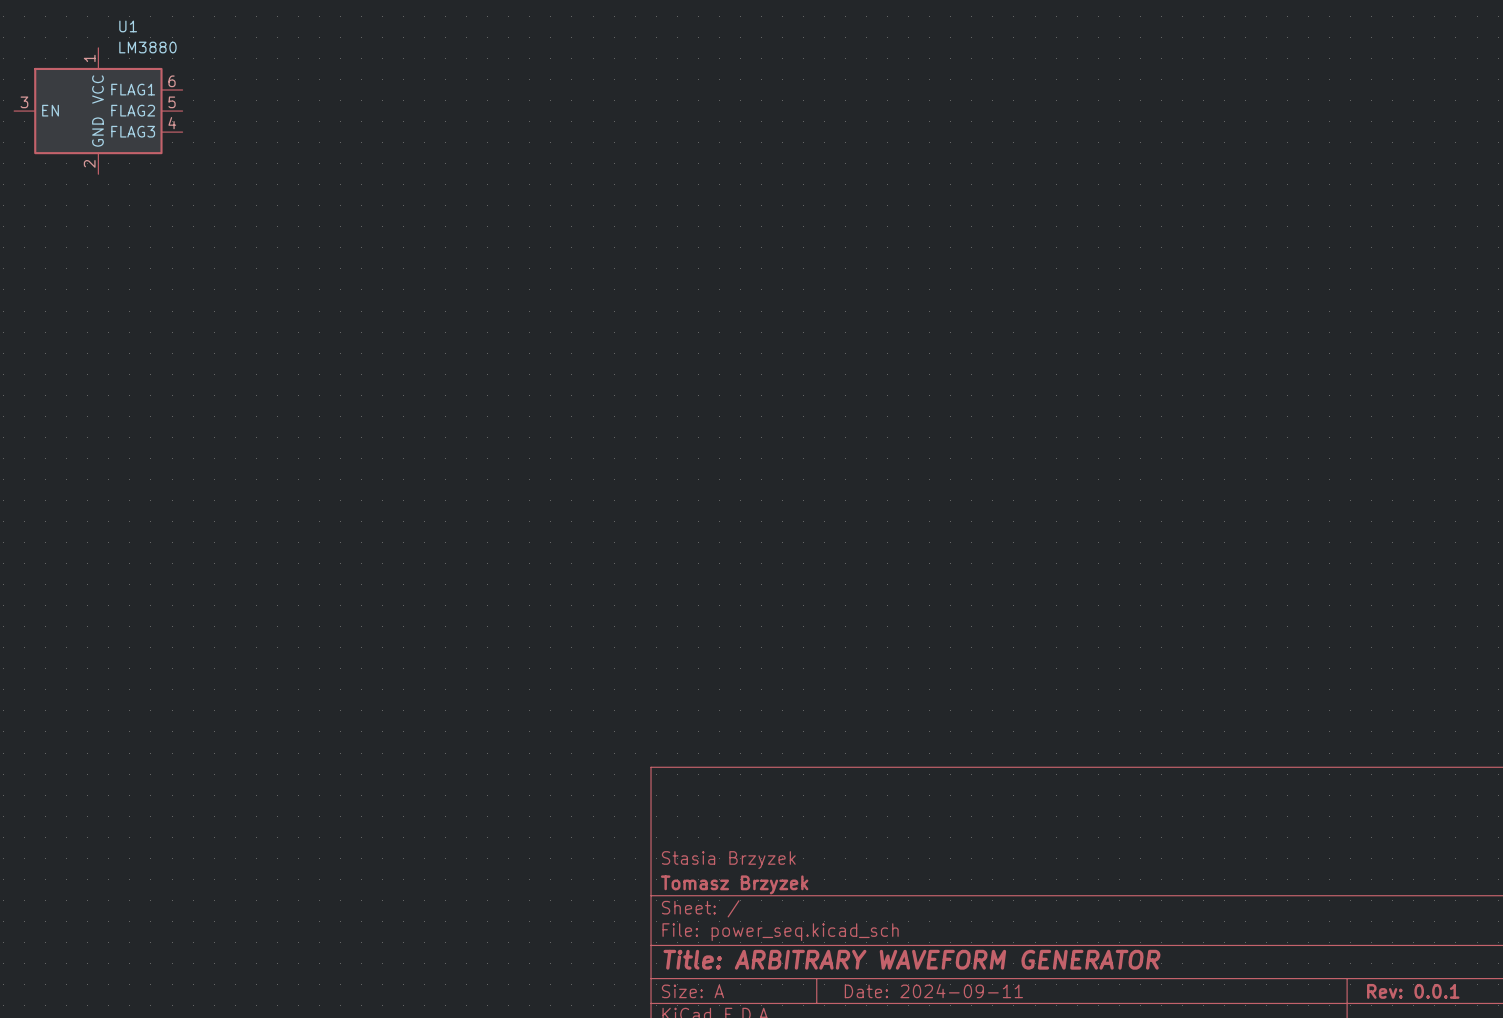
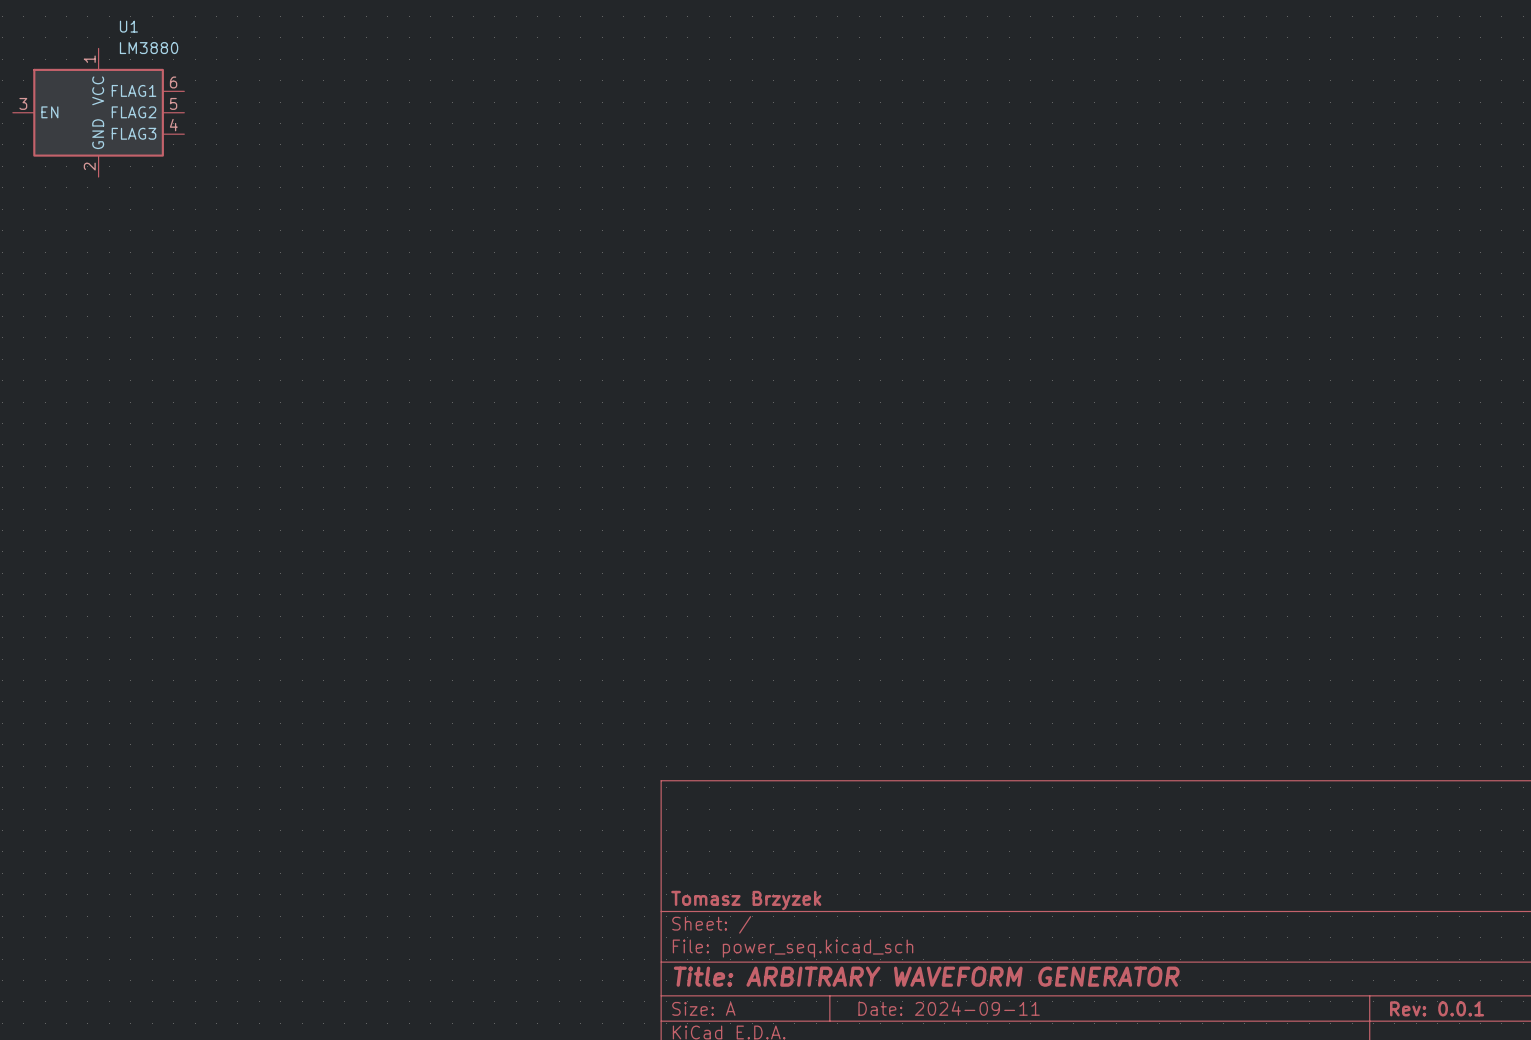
title block: Stasia Brzyzek (728, 860) -> none

